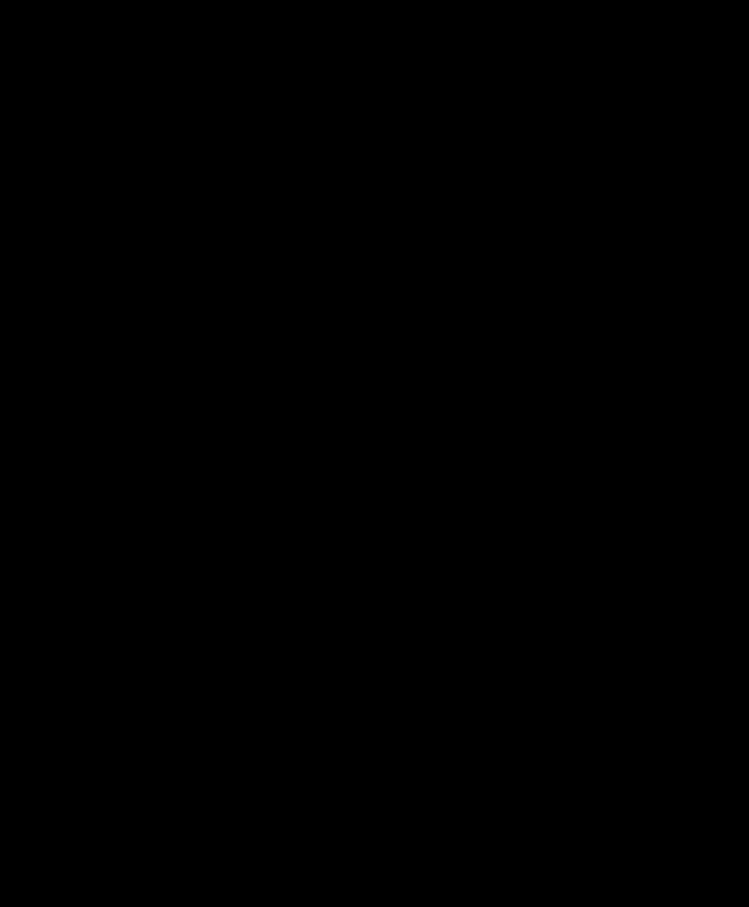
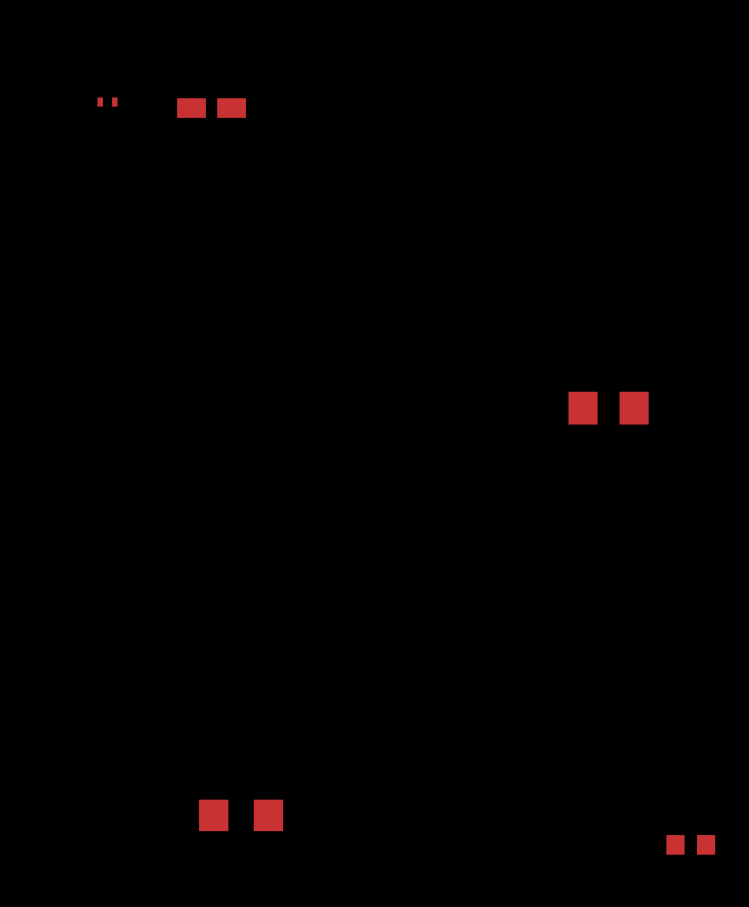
part: none -> (107, 102)
part: none -> (211, 108)
part: none -> (608, 408)
part: none -> (241, 815)
part: none -> (690, 844)

